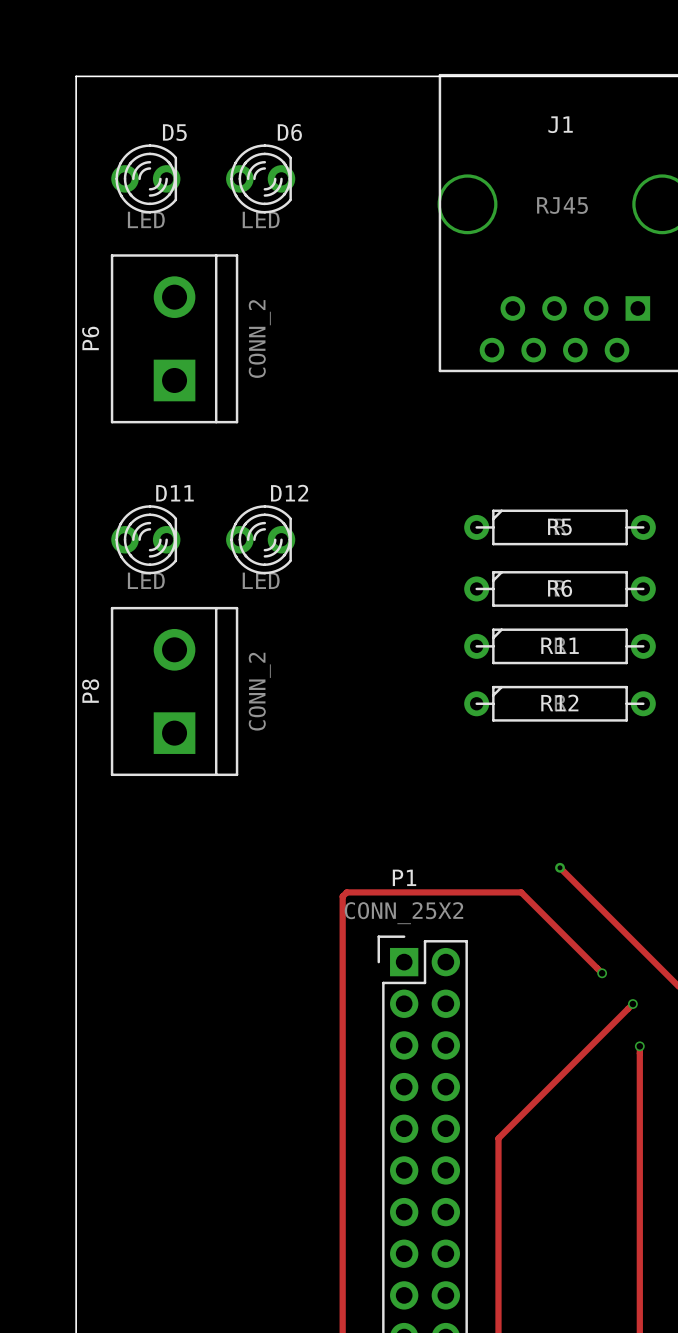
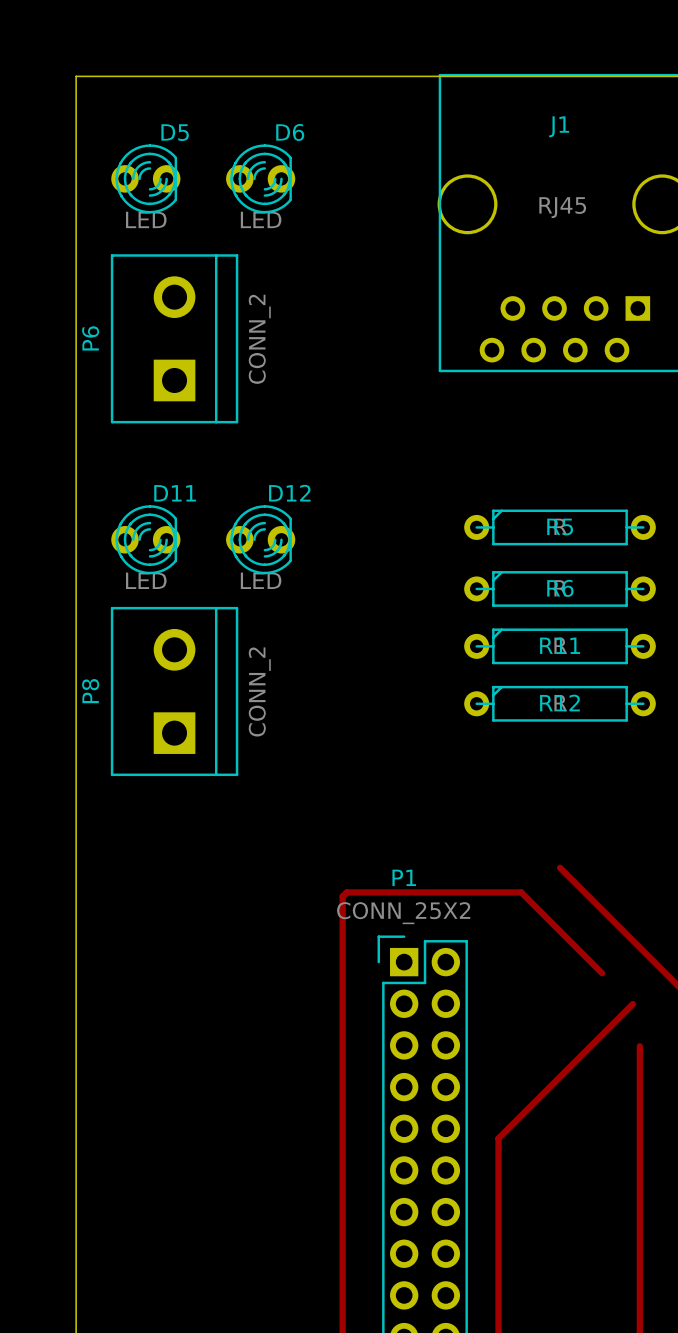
via: (560, 867) -> none
via: (602, 973) -> none
via: (632, 1004) -> none
via: (639, 1046) -> none

